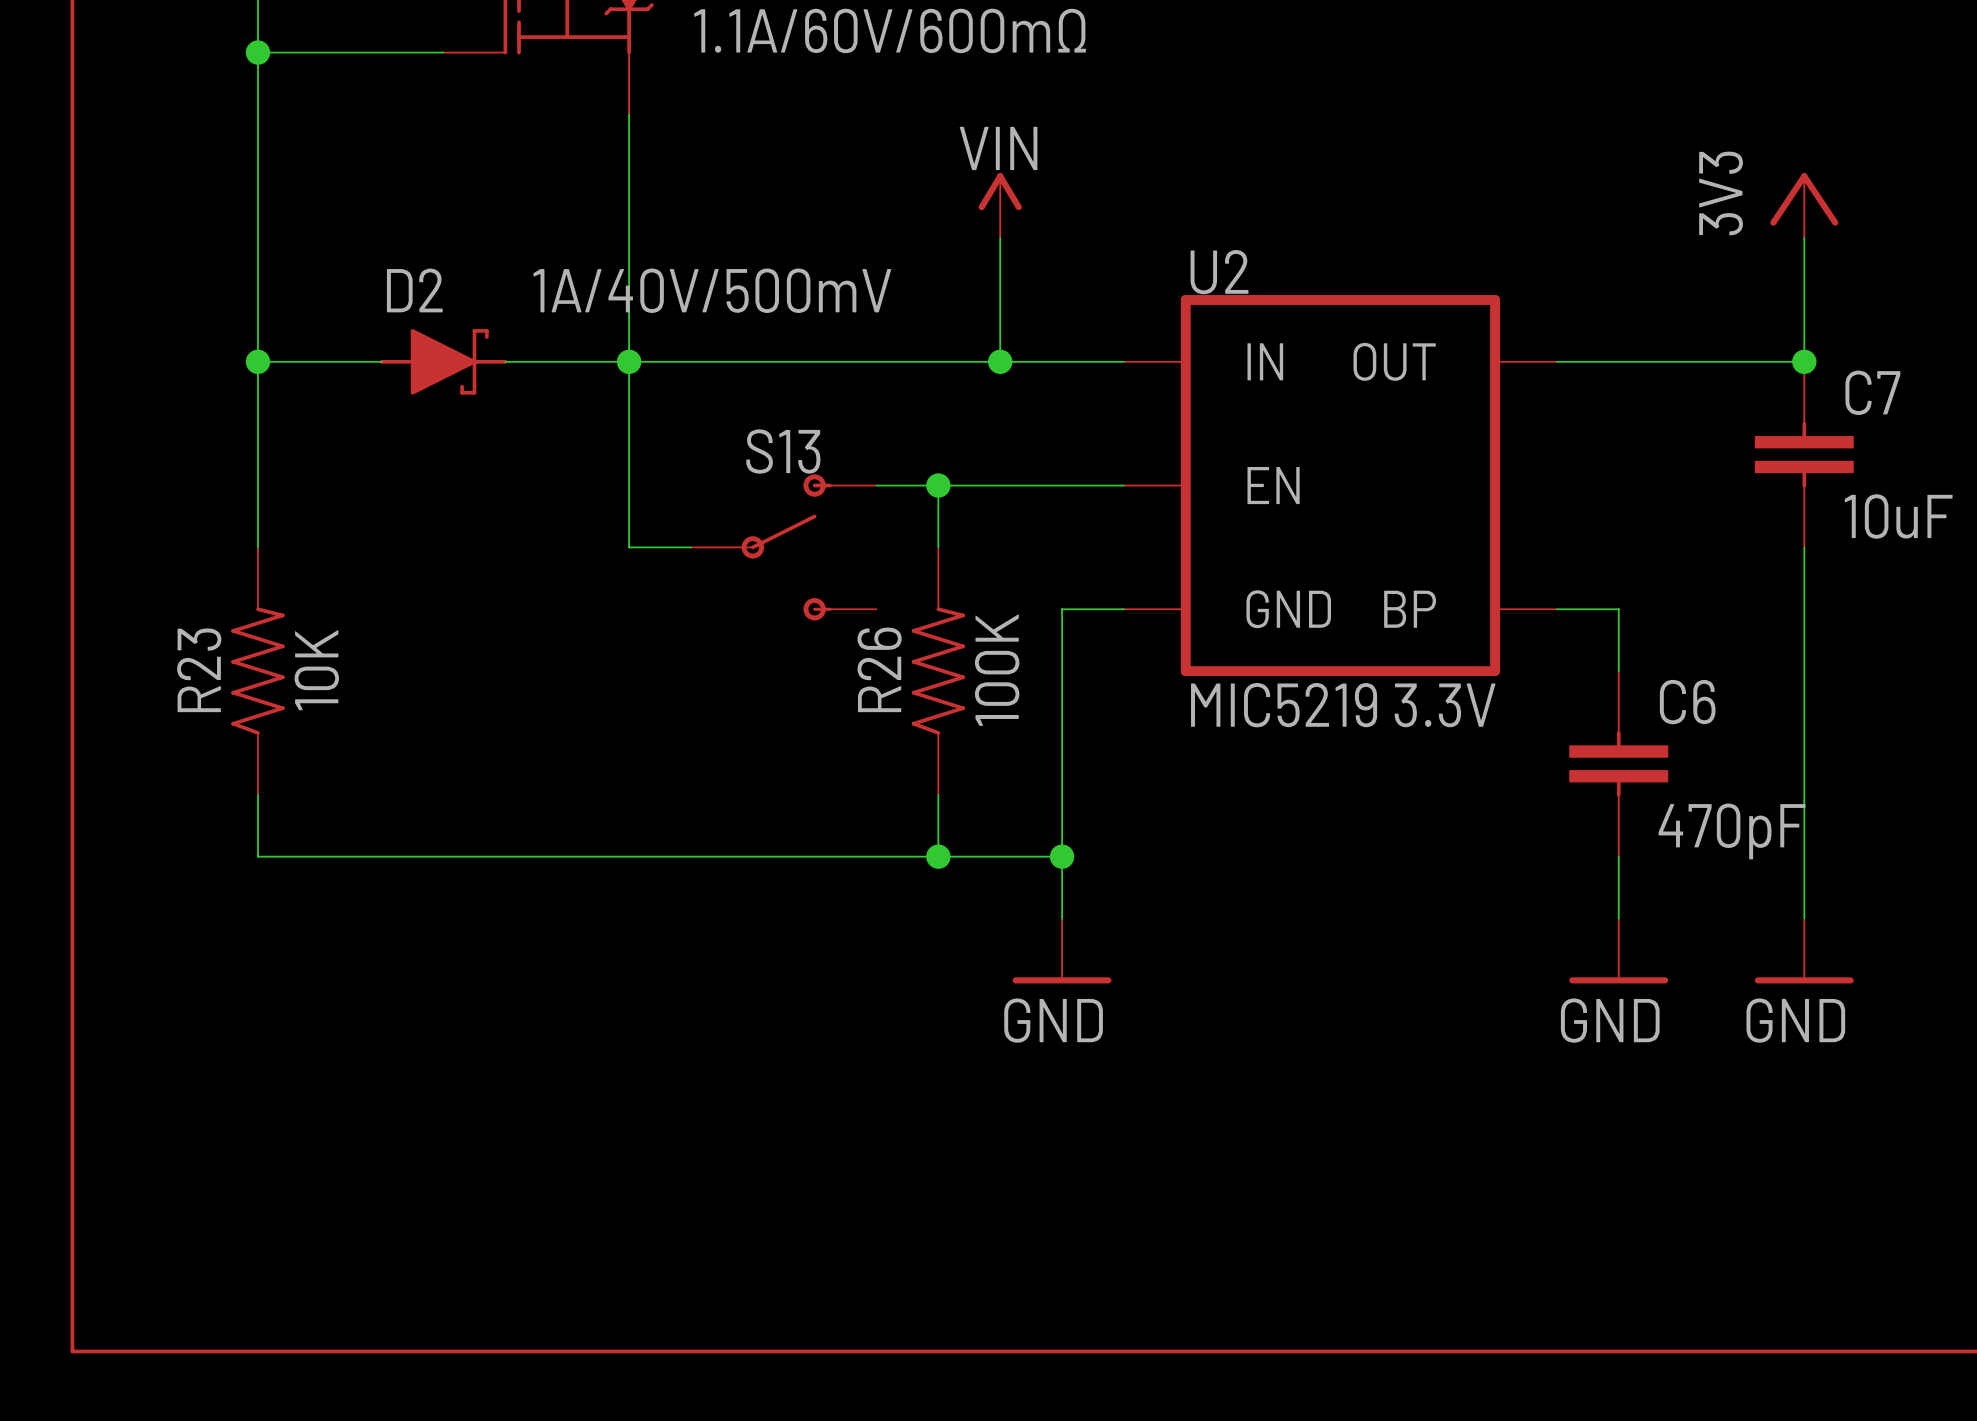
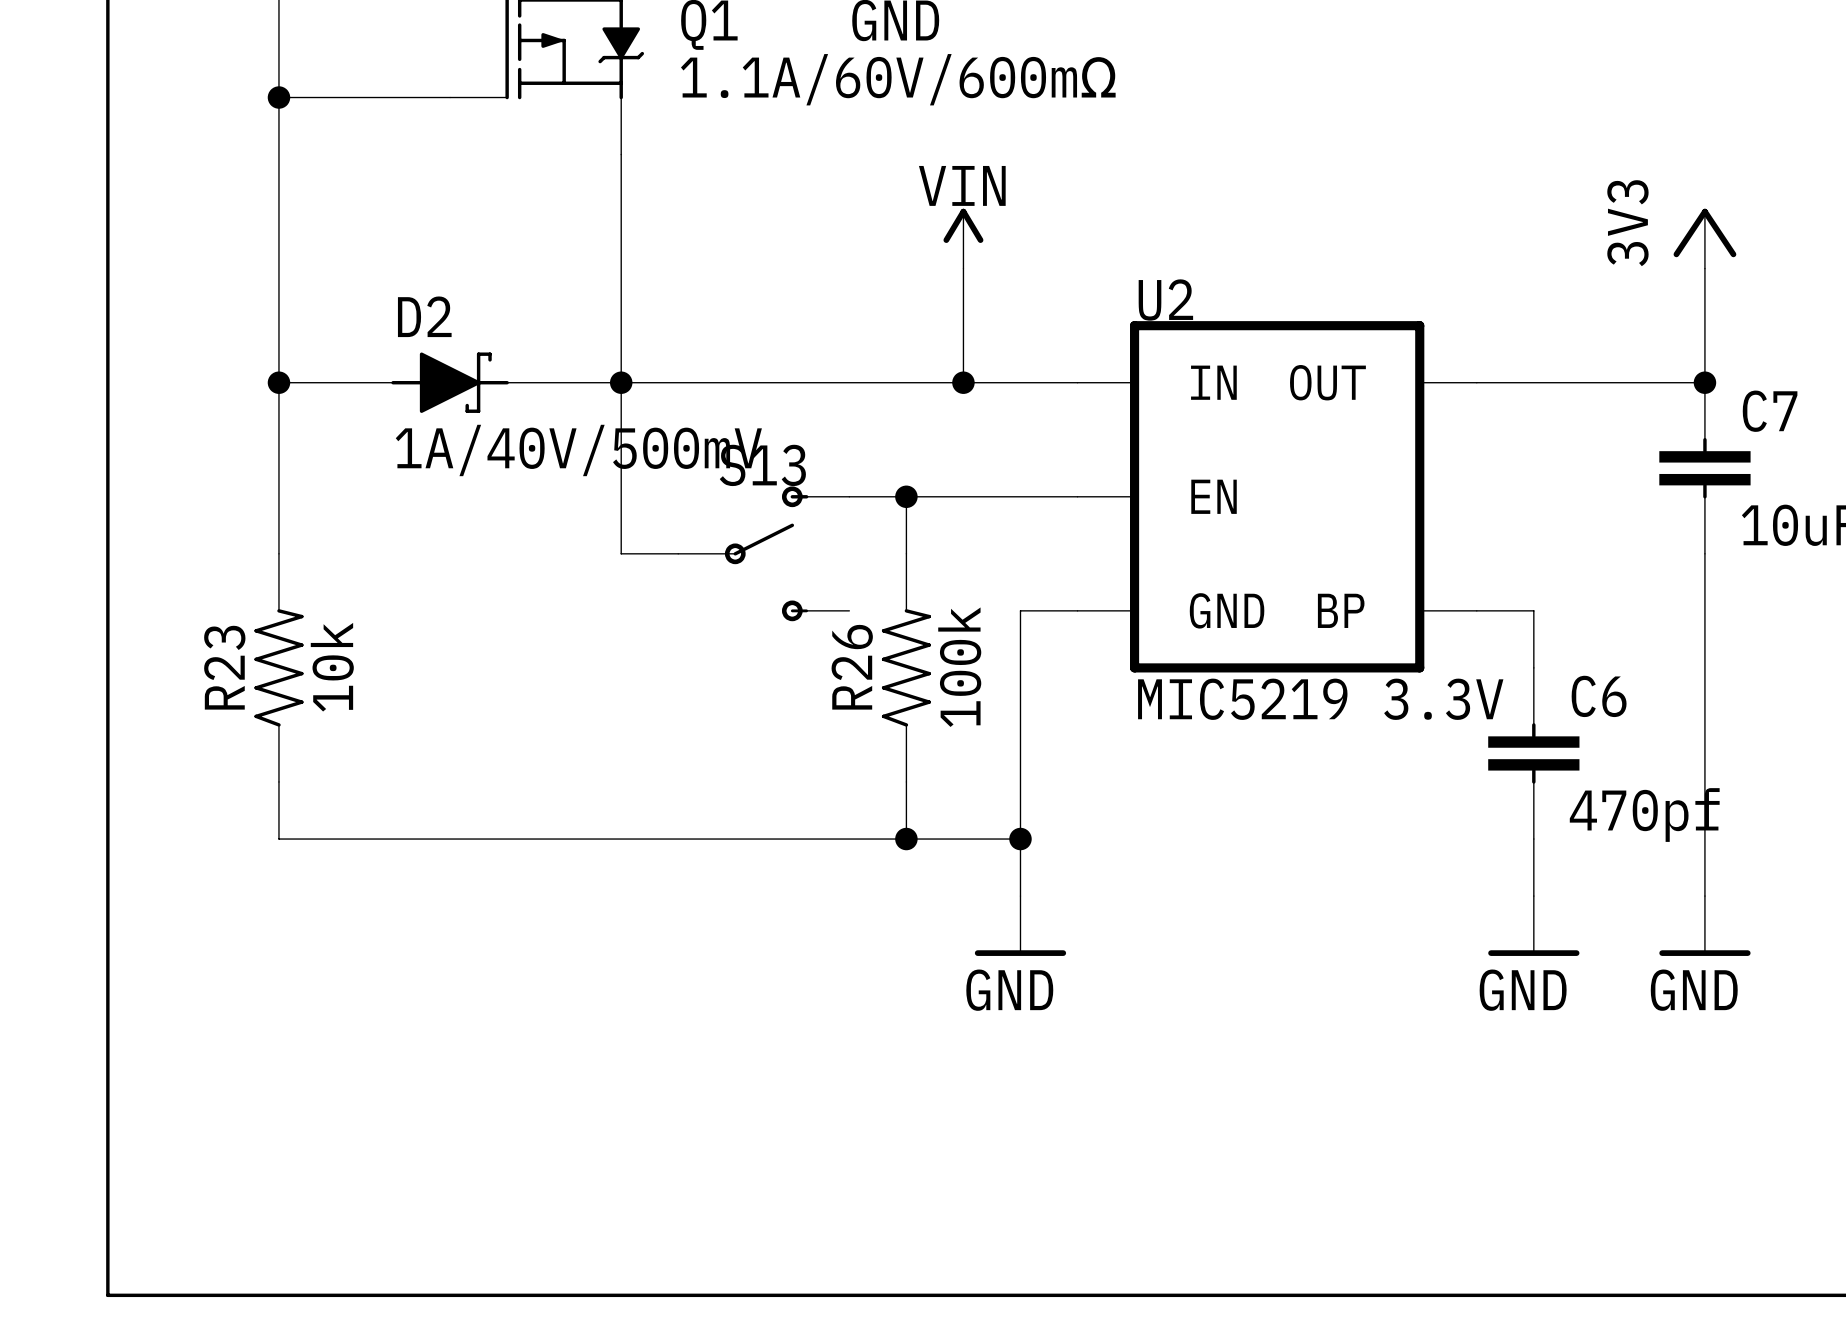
D2 value position: 1A/40V/500mV (712, 290) -> 1A/40V/500mV (578, 450)
R23 value: 10K (316, 670) -> 10k (332, 667)
R26 value: 100K (997, 670) -> 100k (959, 667)
C6 value: 470pF (1732, 831) -> 470pf (1644, 815)

